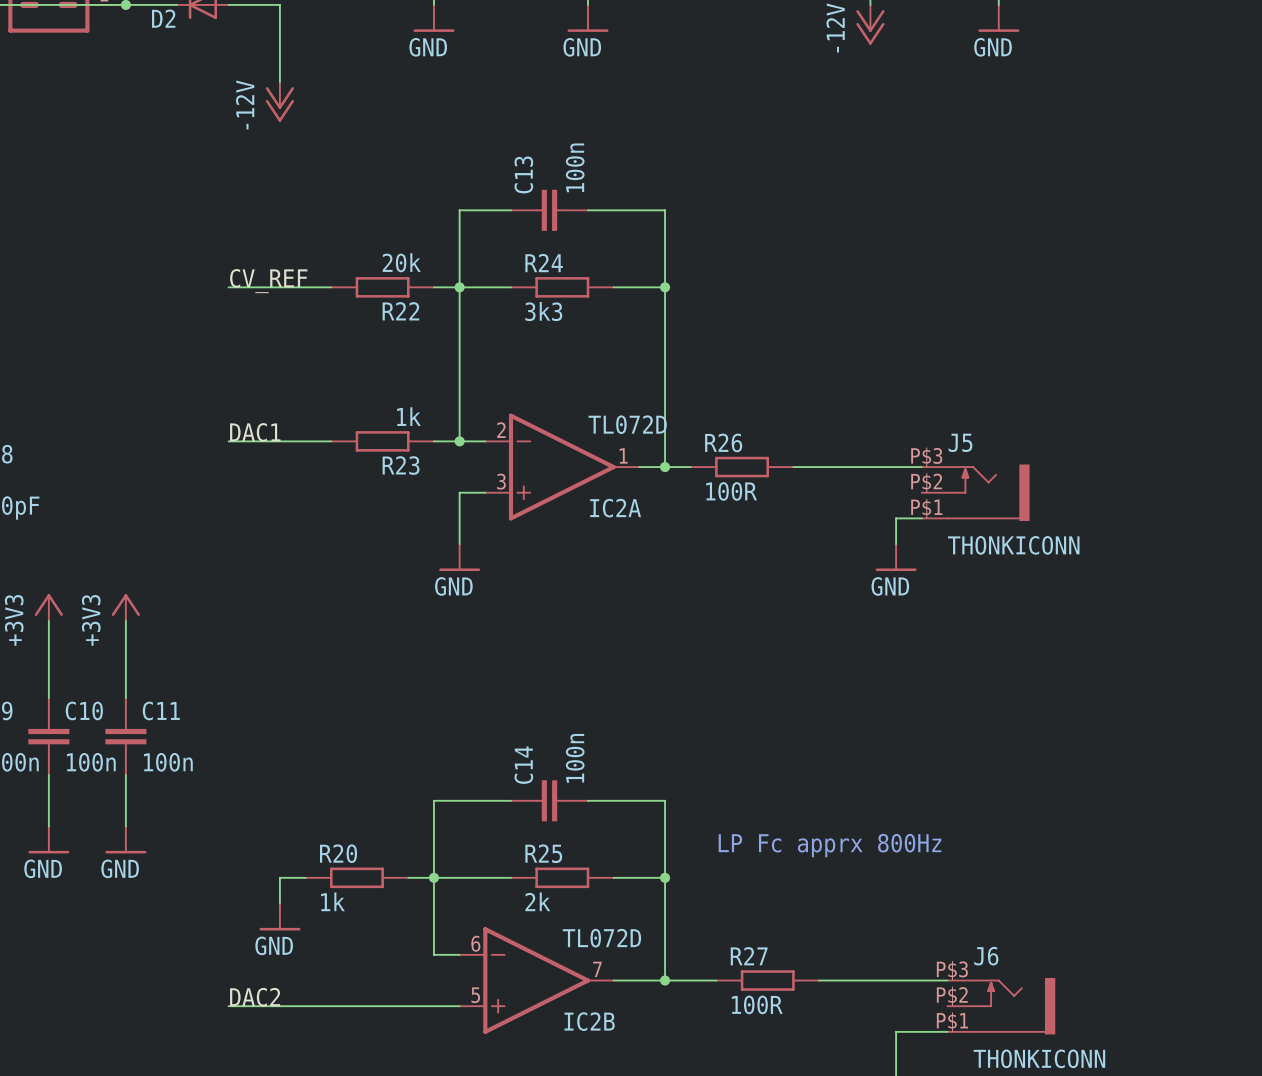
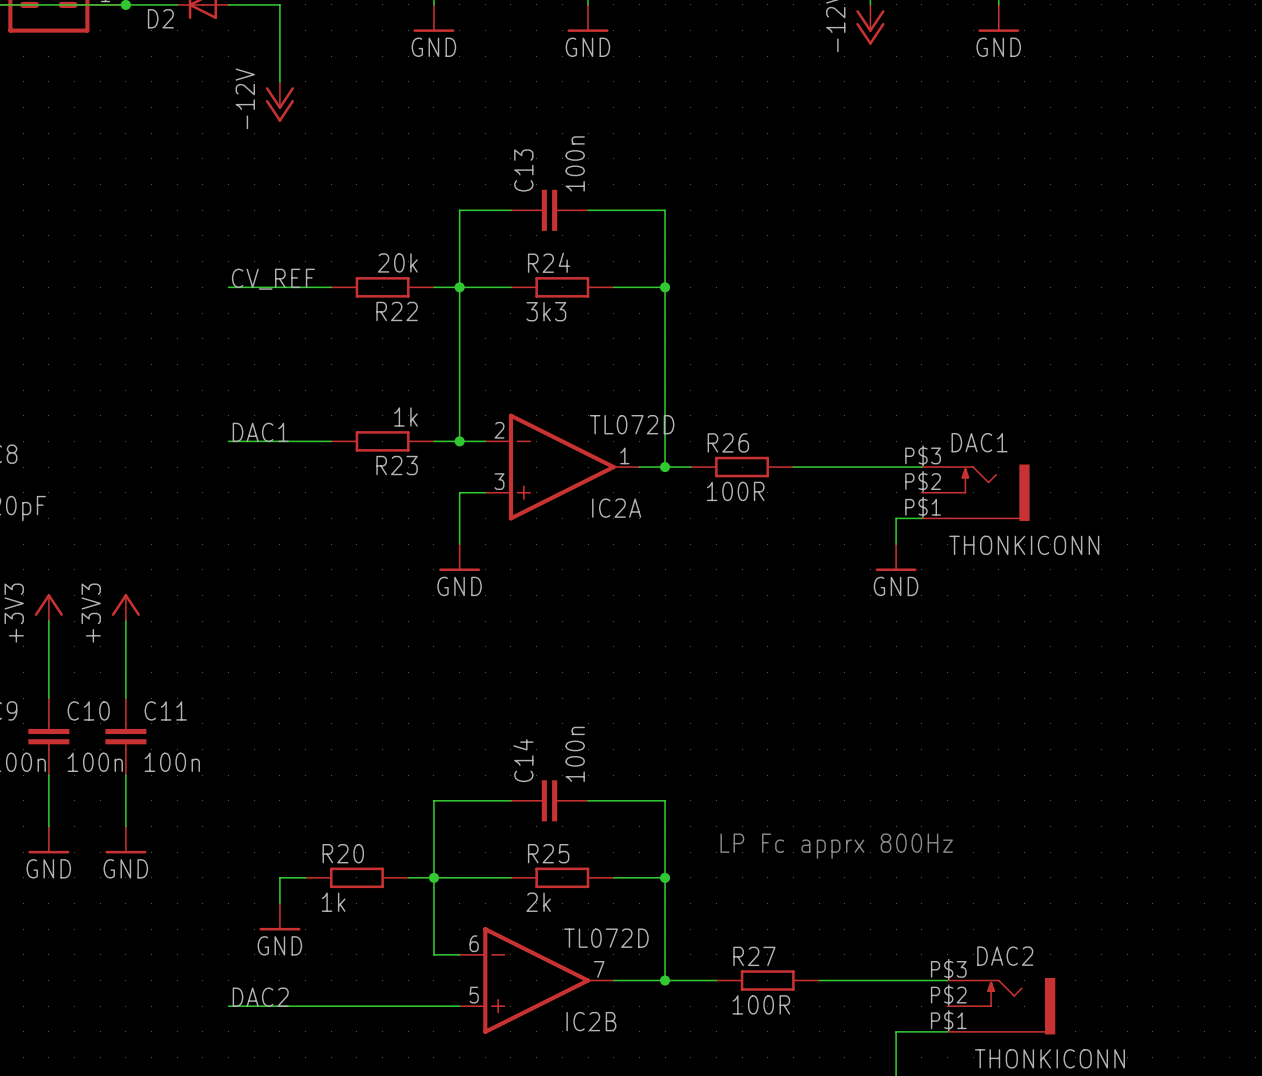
J5 name: J5 (960, 442) -> DAC1 (979, 442)
J6 name: J6 (986, 956) -> DAC2 (1005, 956)

